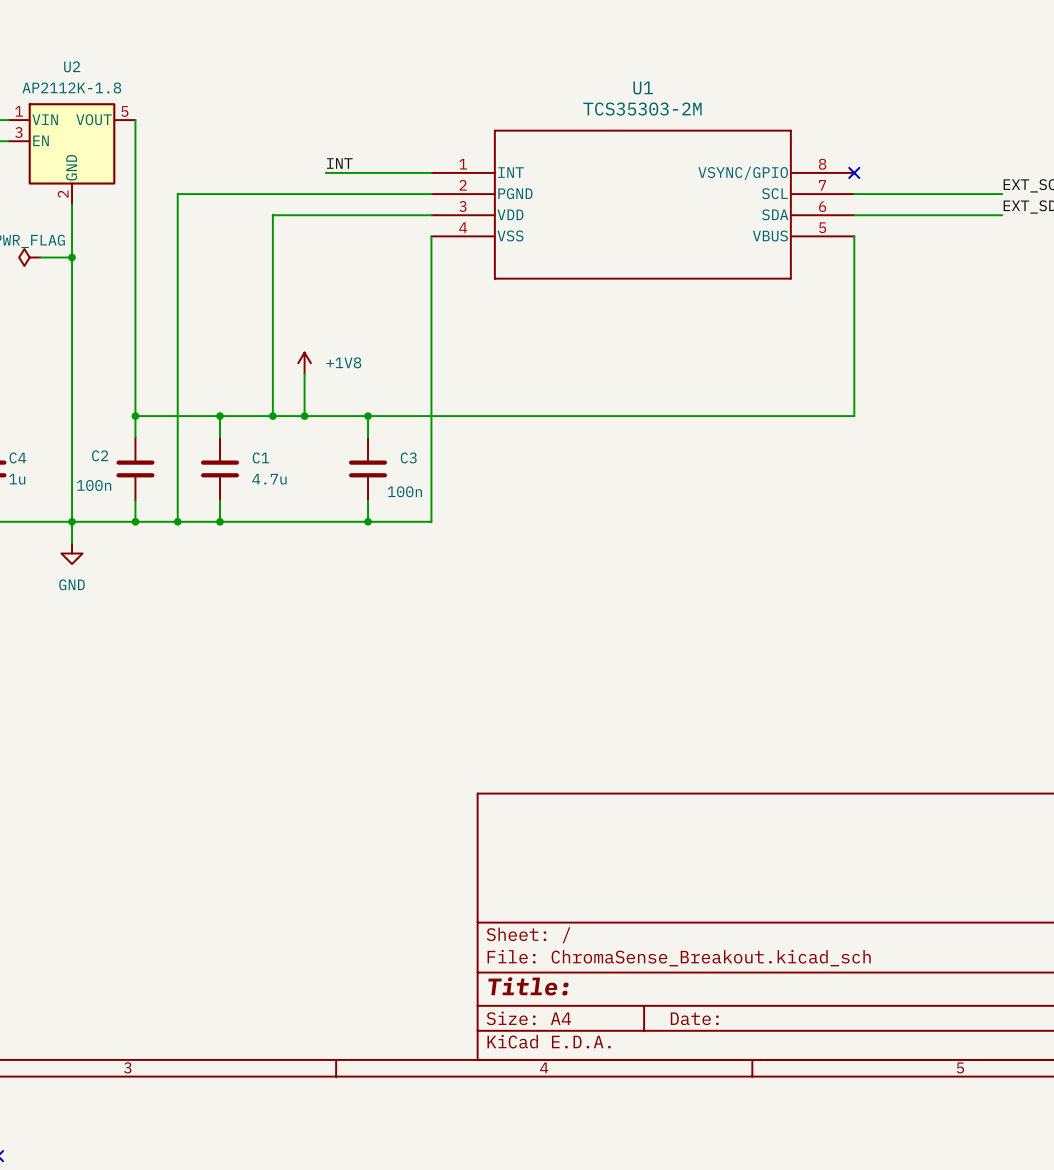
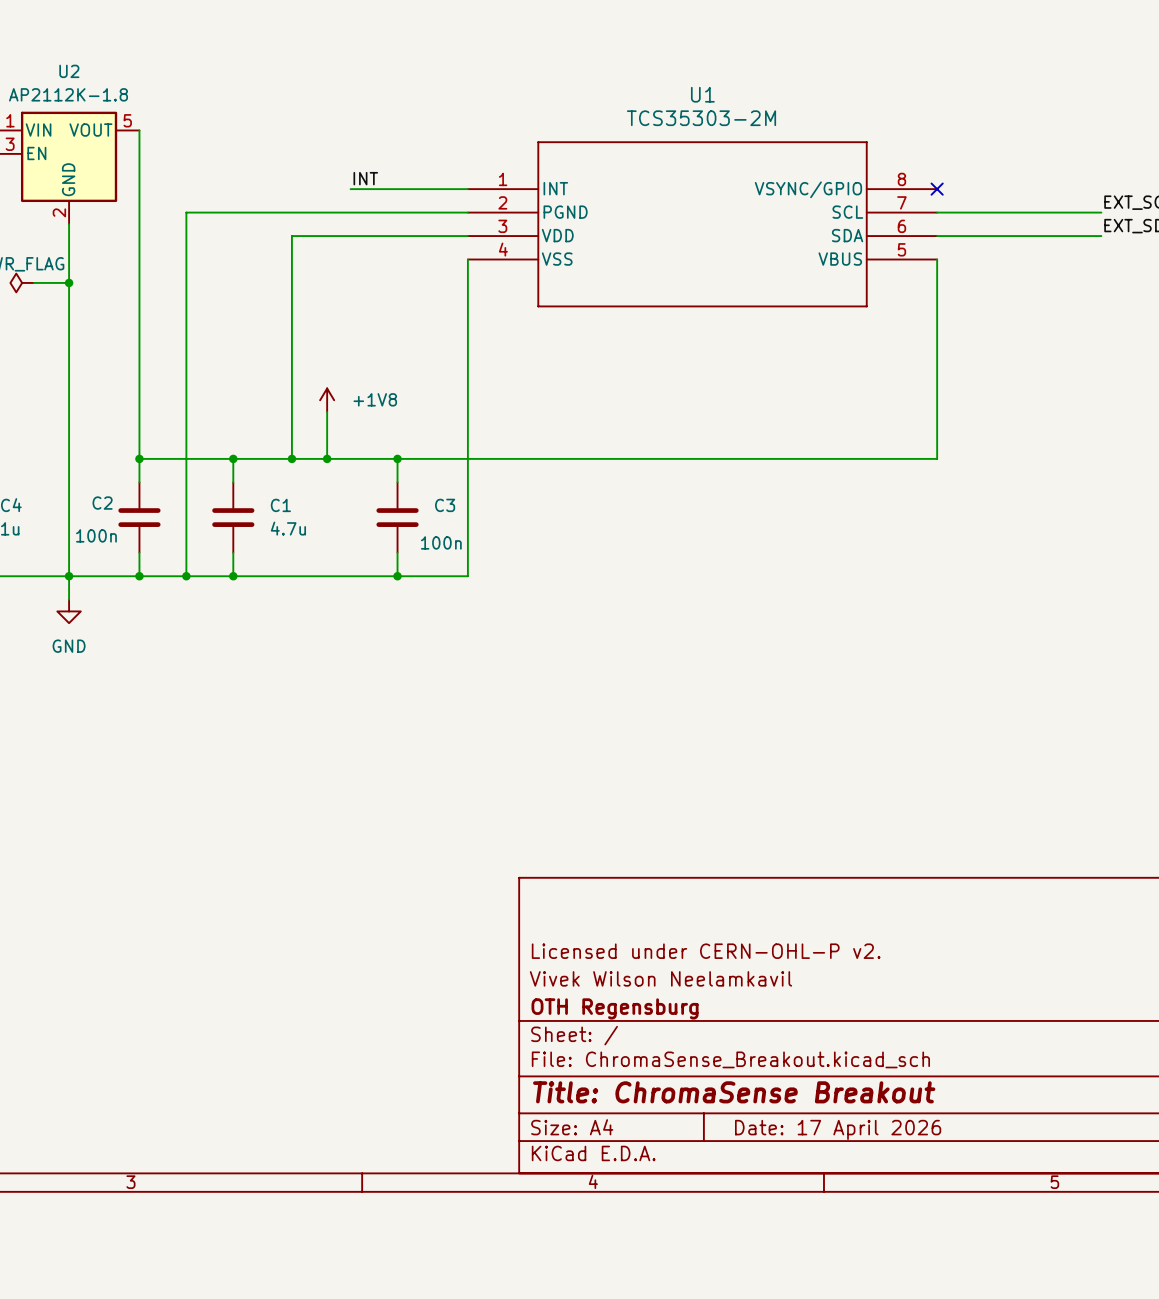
title block: none -> Licensed under CERN-OHL-P v2. (706, 951)
title block: none -> Vivek Wilson Neelamkavil (660, 978)
title block: none -> OTH Regensburg (615, 1008)
title block: Title: (528, 986) -> Title: ChromaSense Breakout (734, 1092)
title block: Date: (694, 1018) -> Date: 17 April 2026 (838, 1129)

